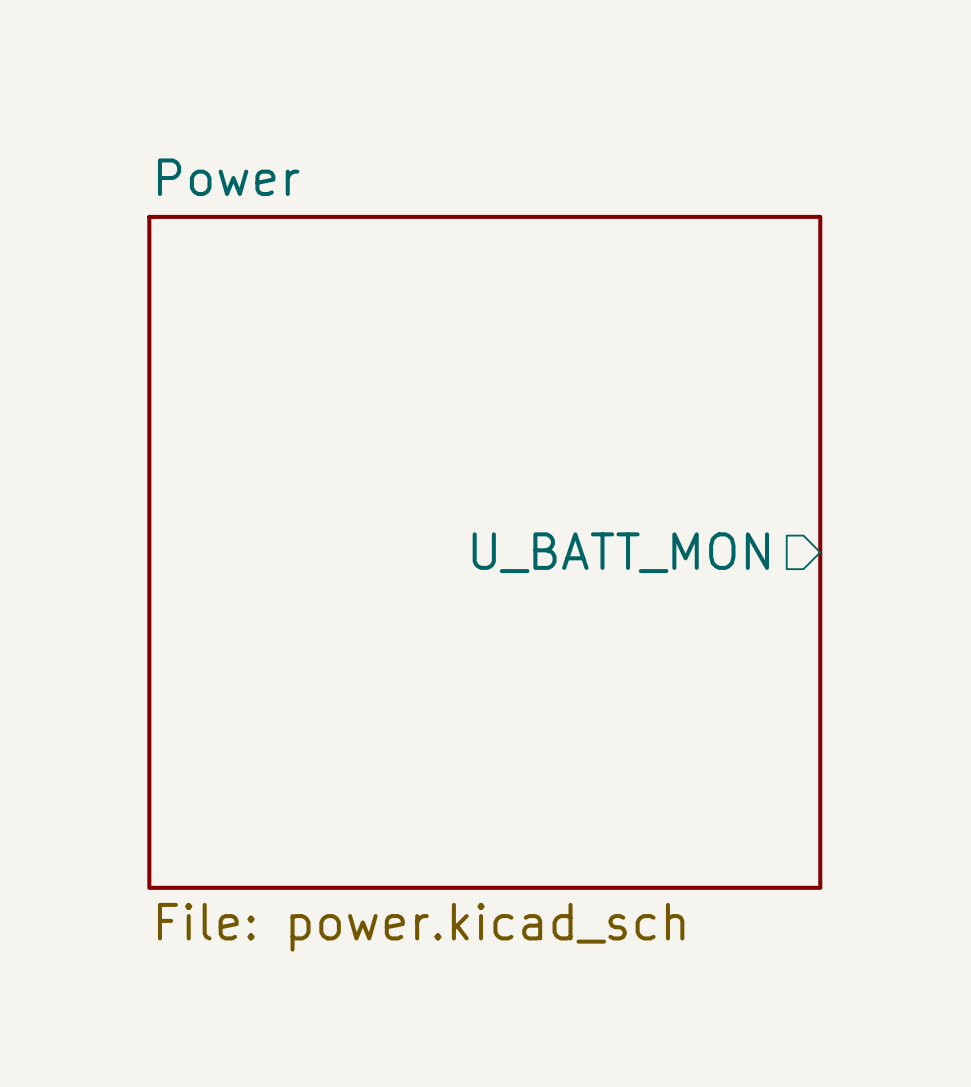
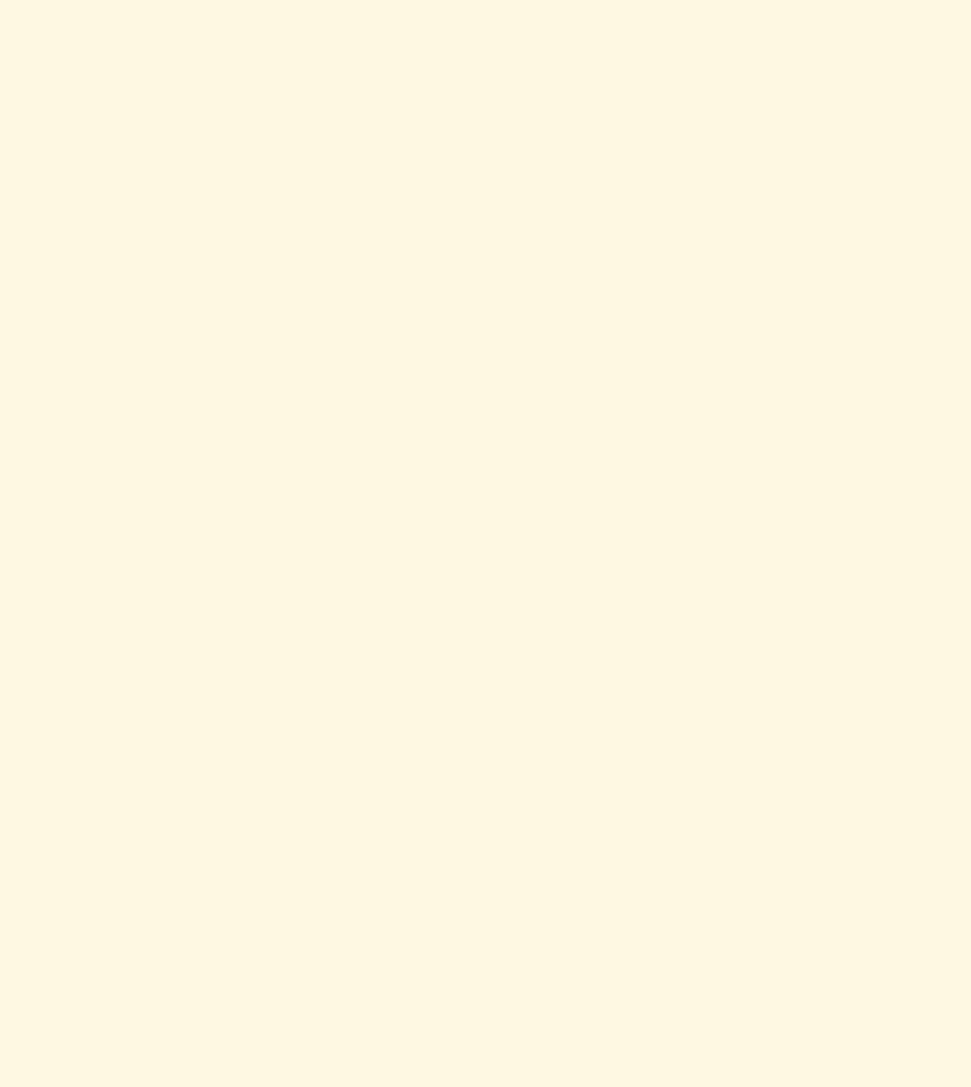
sheet Power: File: power.kicad_sch (484, 552) -> none
sheet pin: U_BATT_MON (620, 552) -> none

